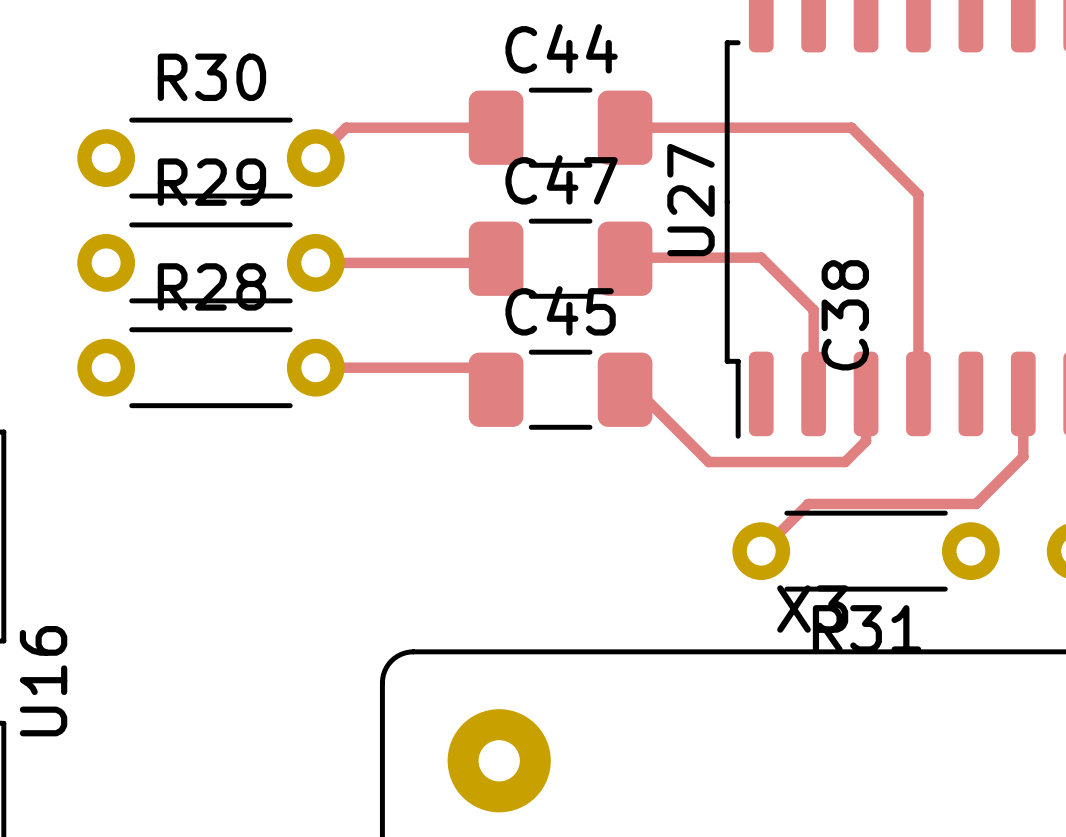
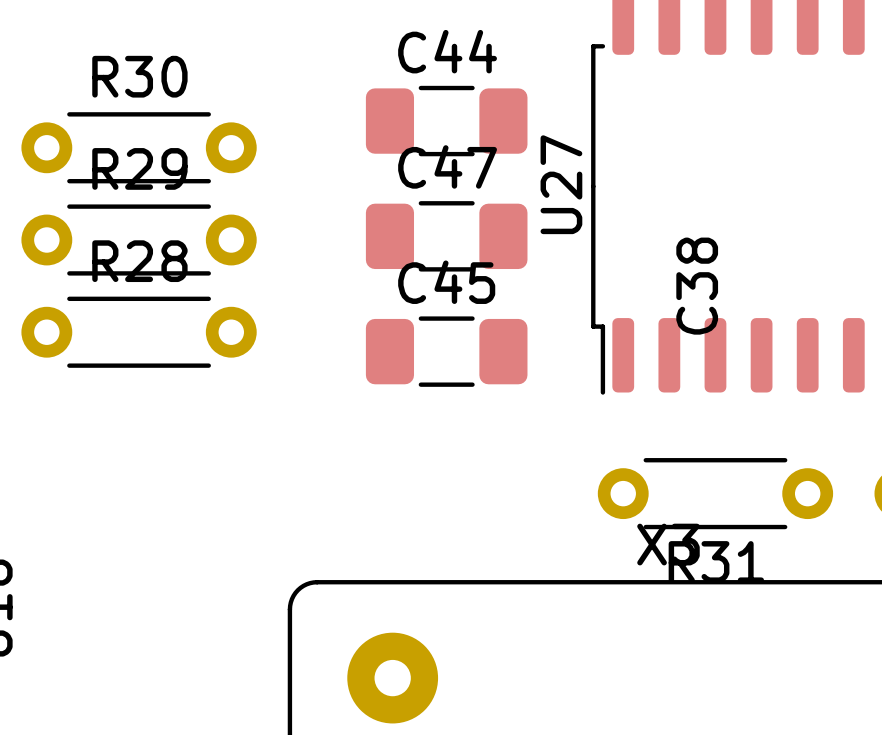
track: (496, 127) (346, 127) (315, 158) -> none
track: (625, 127) (851, 127) (918, 194) (918, 393) -> none
track: (496, 258) (491, 262) (315, 262) -> none
track: (625, 258) (761, 257) (813, 310) (813, 393) -> none
track: (315, 367) (474, 367) (496, 389) -> none
track: (625, 389) (636, 389) (708, 462) (845, 462) (866, 441) (866, 393) -> none
track: (1023, 393) (1023, 456) (976, 503) (808, 503) (761, 551) -> none

